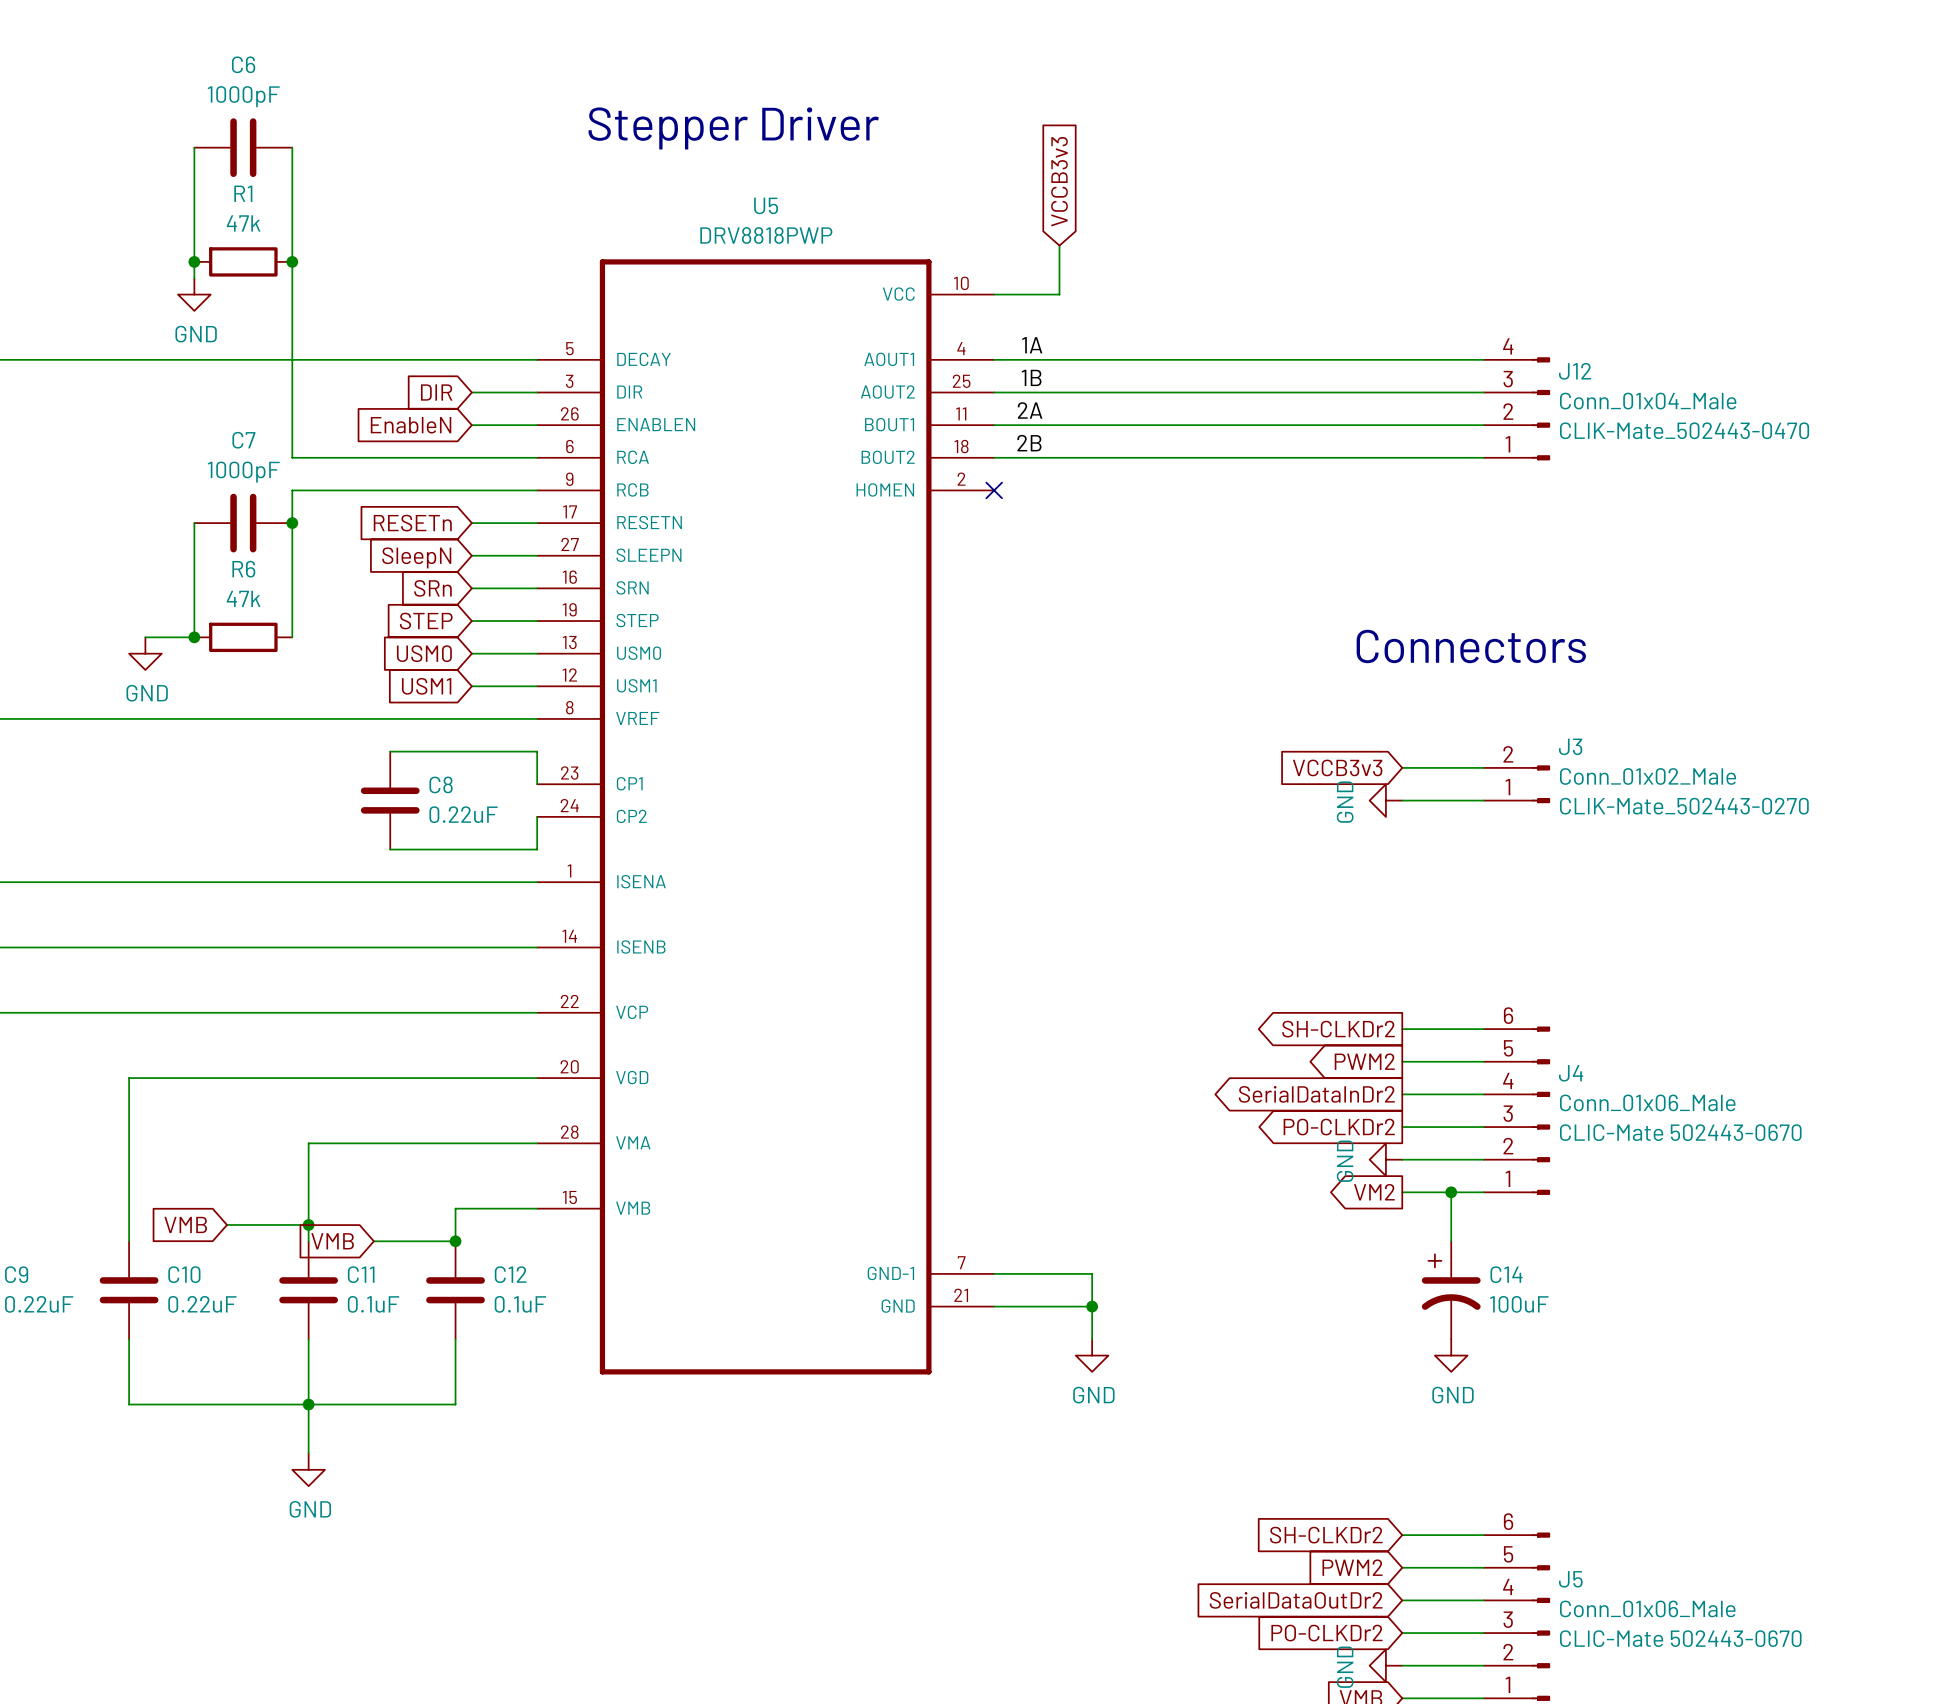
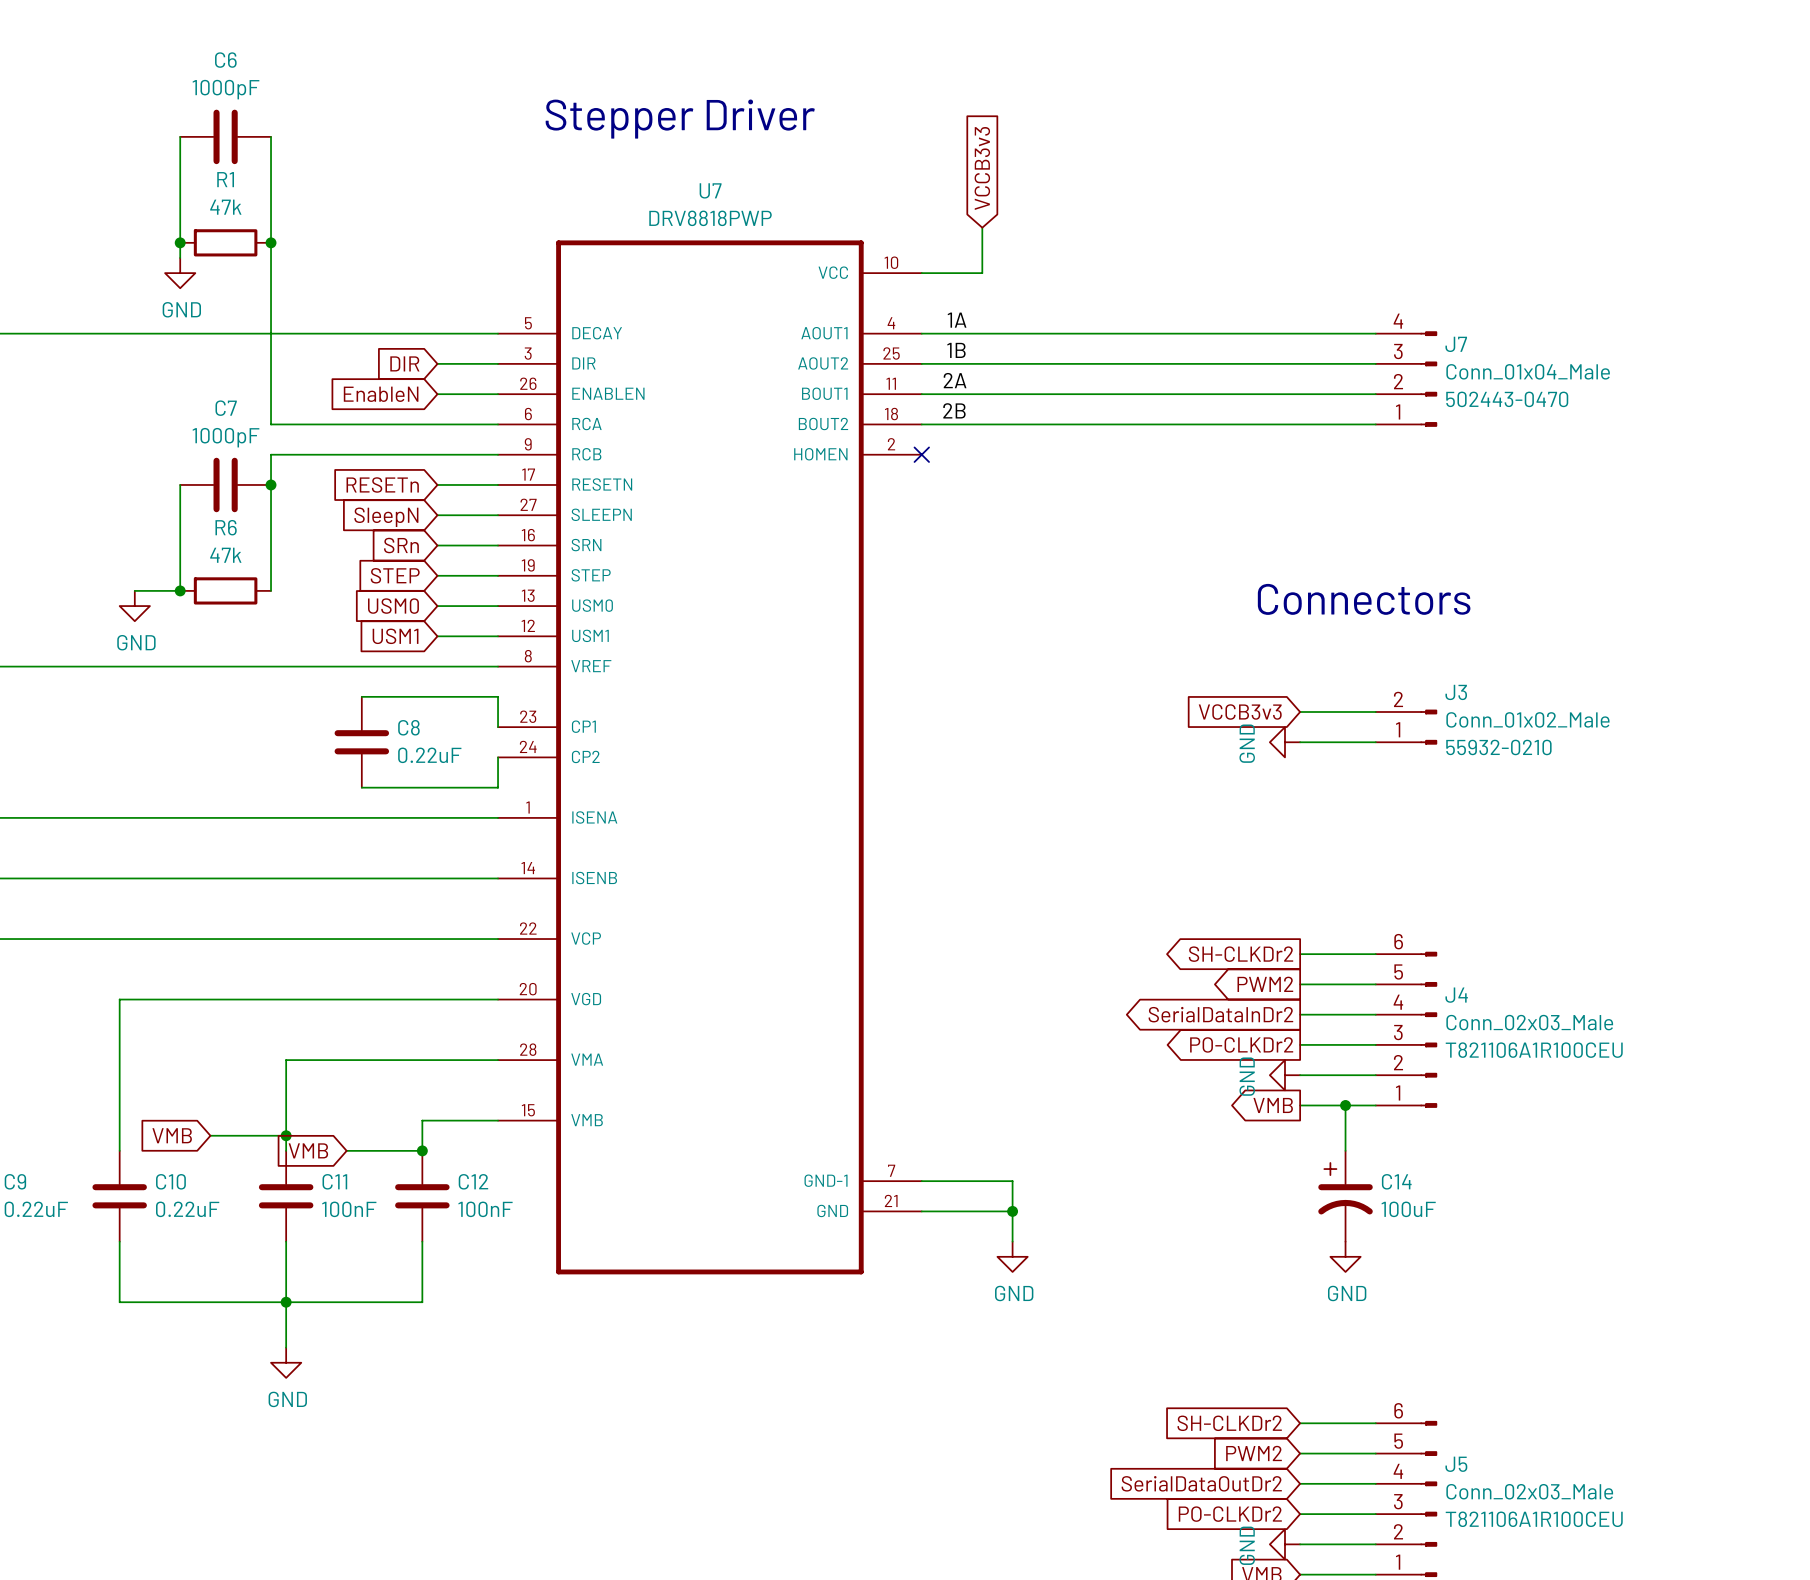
U5 name: U5 (766, 205) -> U7 (710, 190)
J12 name: J12 (1575, 371) -> J7 (1456, 344)
J12 text: CLIK-Mate_502443-0470 (1684, 430) -> 502443-0470 (1507, 399)
J3 text: CLIK-Mate_502443-0270 (1684, 806) -> 55932-0210 (1498, 747)
J4 value: Conn_01x06_Male (1647, 1102) -> Conn_02x03_Male (1529, 1022)
J4 text: CLIC-Mate 502443-0670 (1680, 1132) -> T821106A1R100CEU (1534, 1050)
global label: VM2 (1374, 1192) -> VMB (1273, 1105)
C11 value: 0.1uF (373, 1304) -> 100nF (349, 1209)
C12 value: 0.1uF (520, 1304) -> 100nF (485, 1209)
J5 value: Conn_01x06_Male (1647, 1608) -> Conn_02x03_Male (1529, 1491)
J5 text: CLIC-Mate 502443-0670 (1680, 1638) -> T821106A1R100CEU (1534, 1519)

